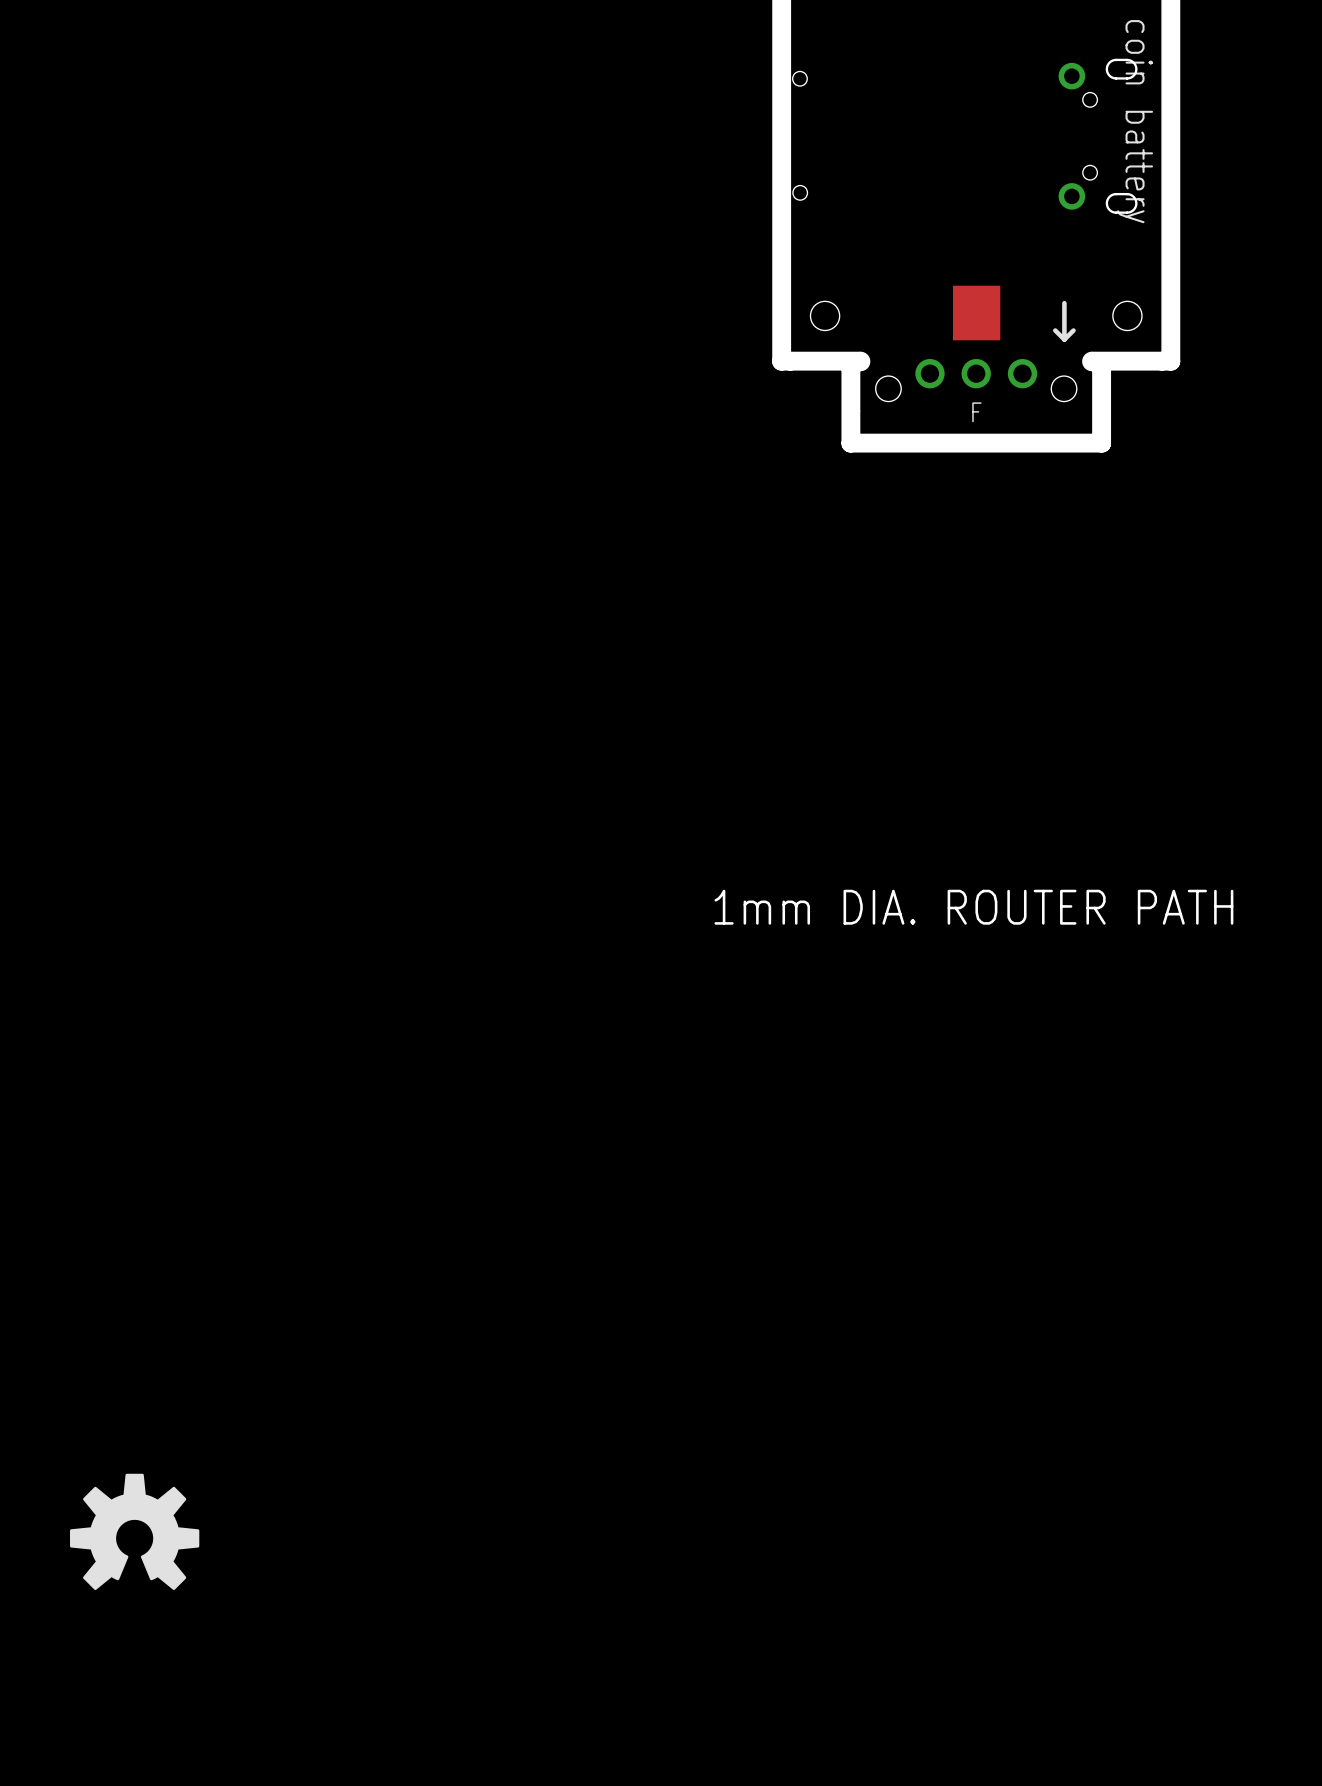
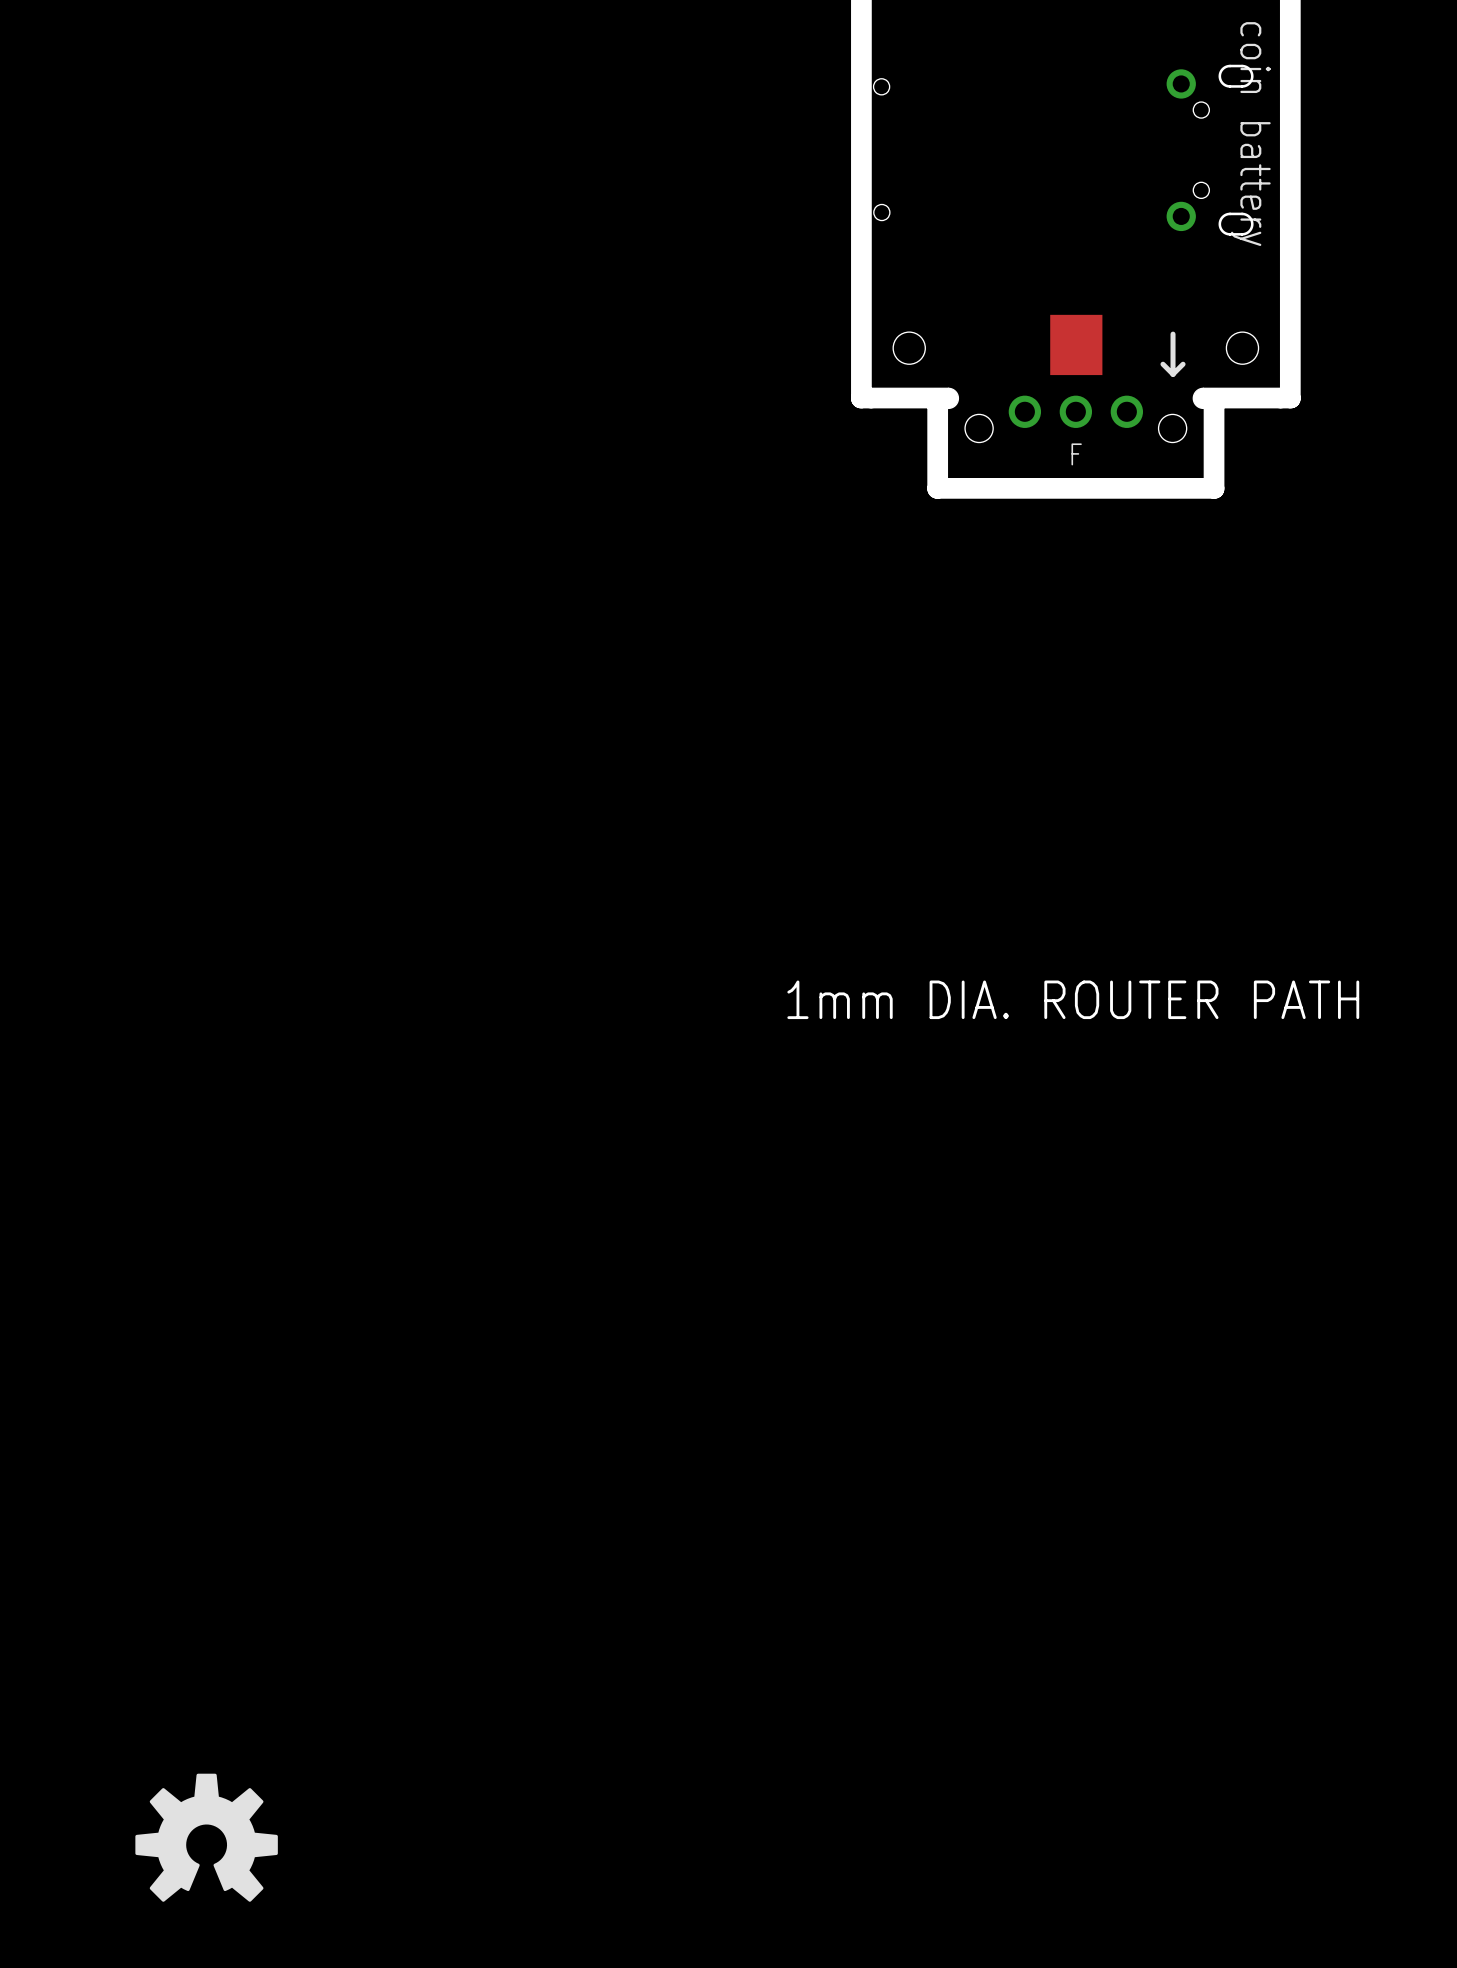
drawing position: (134, 1531) -> (206, 1837)

